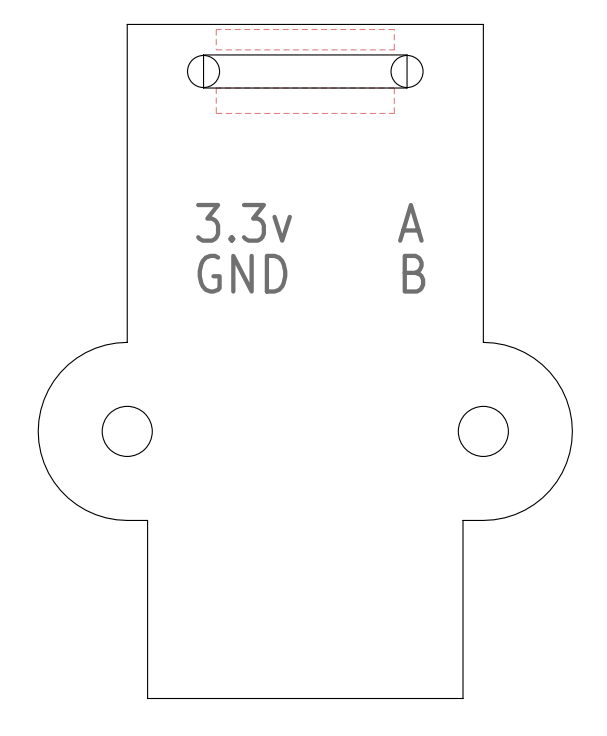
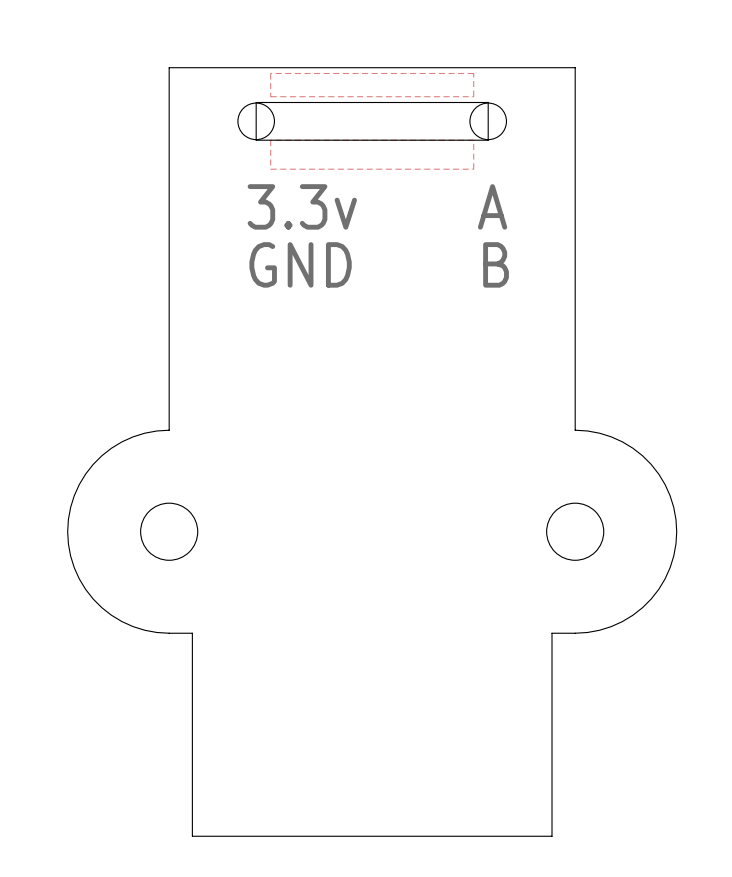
text position: 3.3v (244, 222) -> 3.3v (302, 206)
text position: A (410, 222) -> A (492, 206)
text position: GND (242, 273) -> GND (300, 264)
text position: B (413, 273) -> B (496, 264)

